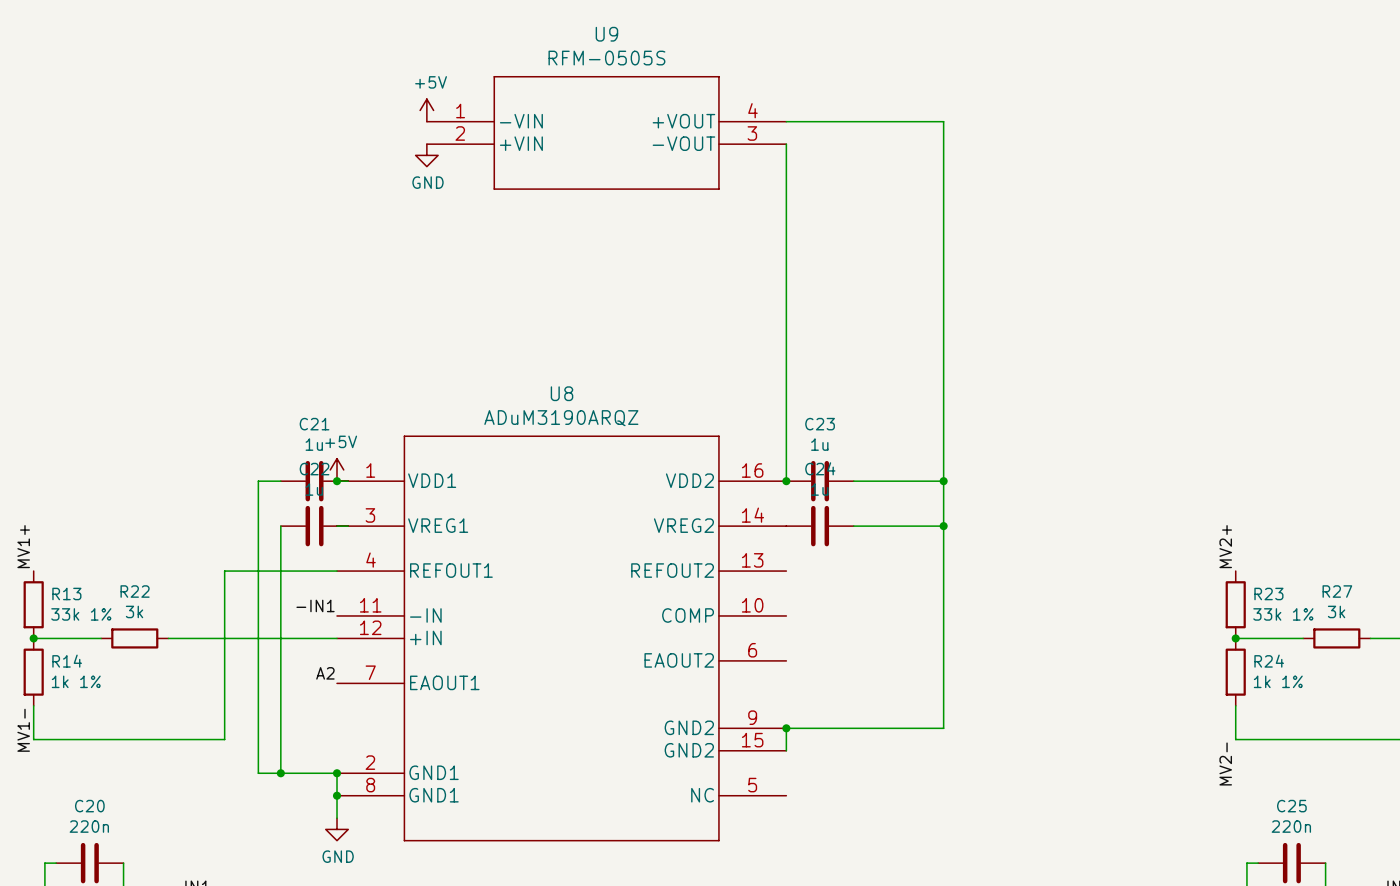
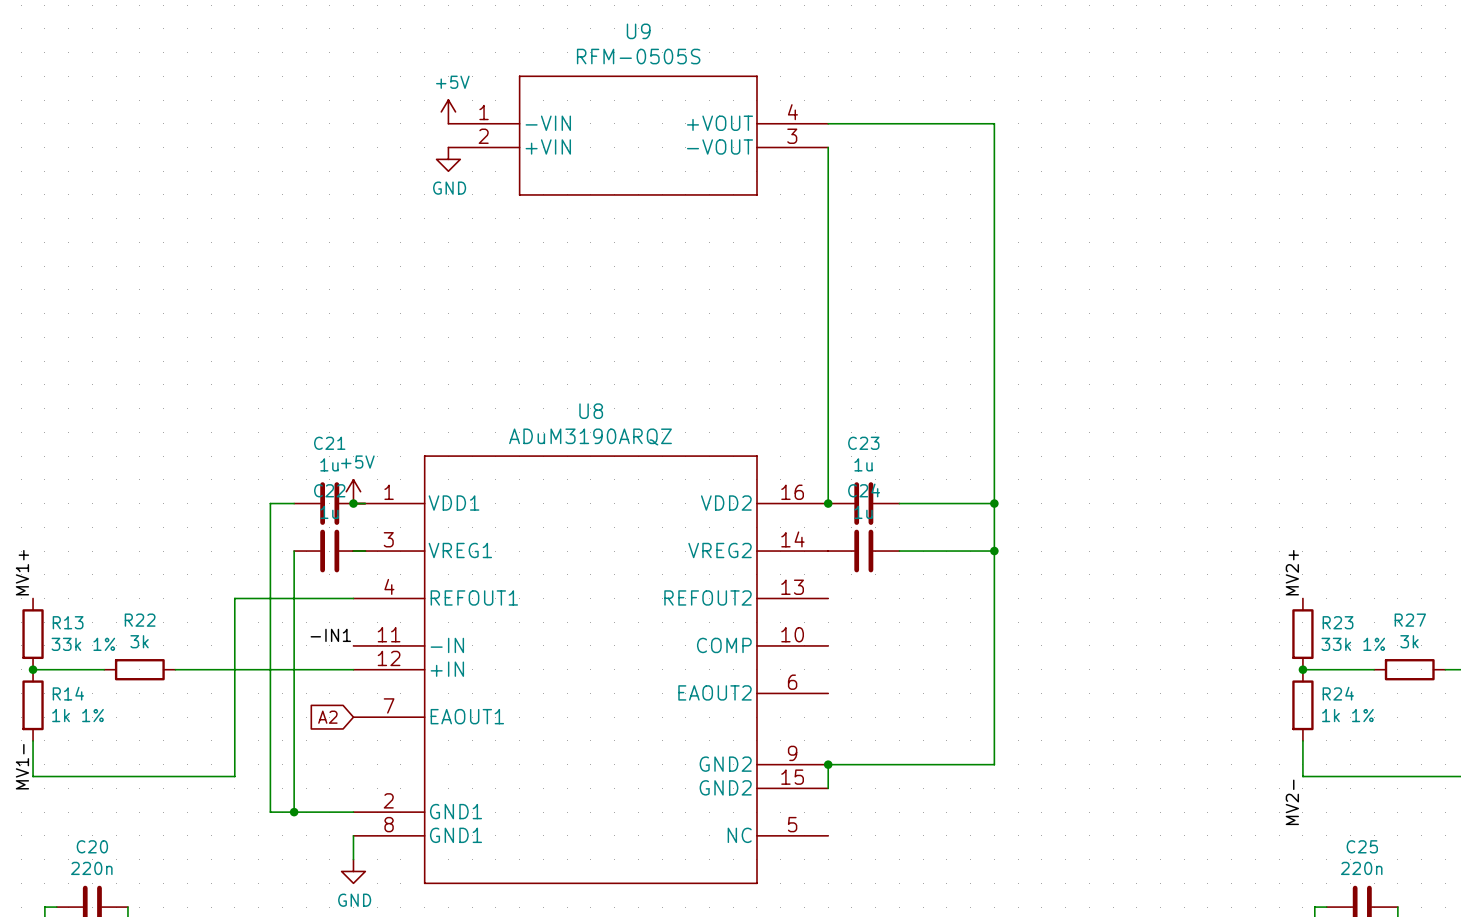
label: A2 (325, 673) -> none
global label: none -> A2 (327, 717)
wire: (337, 773) (337, 795) -> none
junction: (337, 773) -> none
junction: (337, 795) -> none

